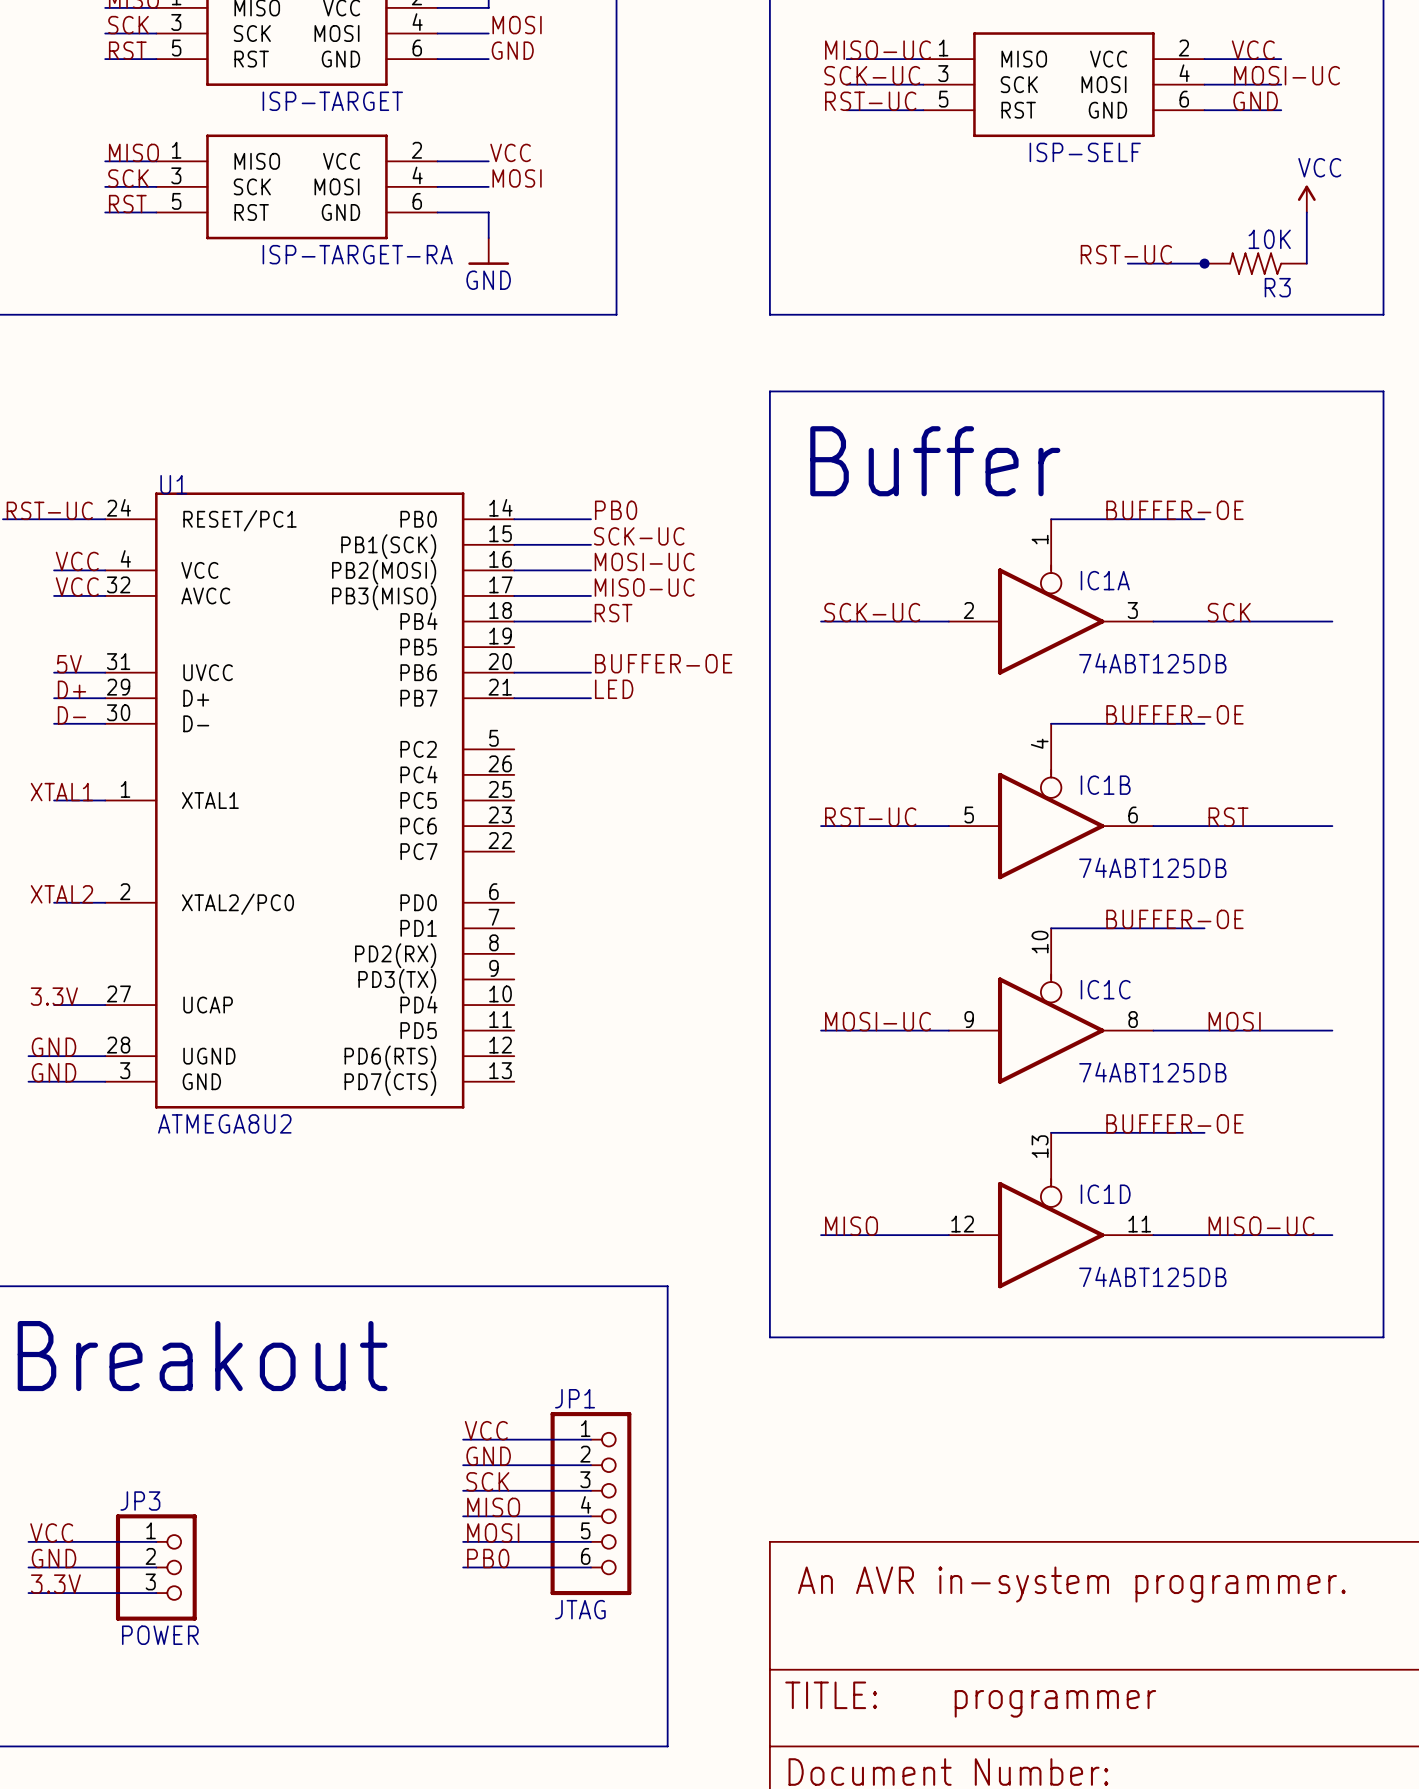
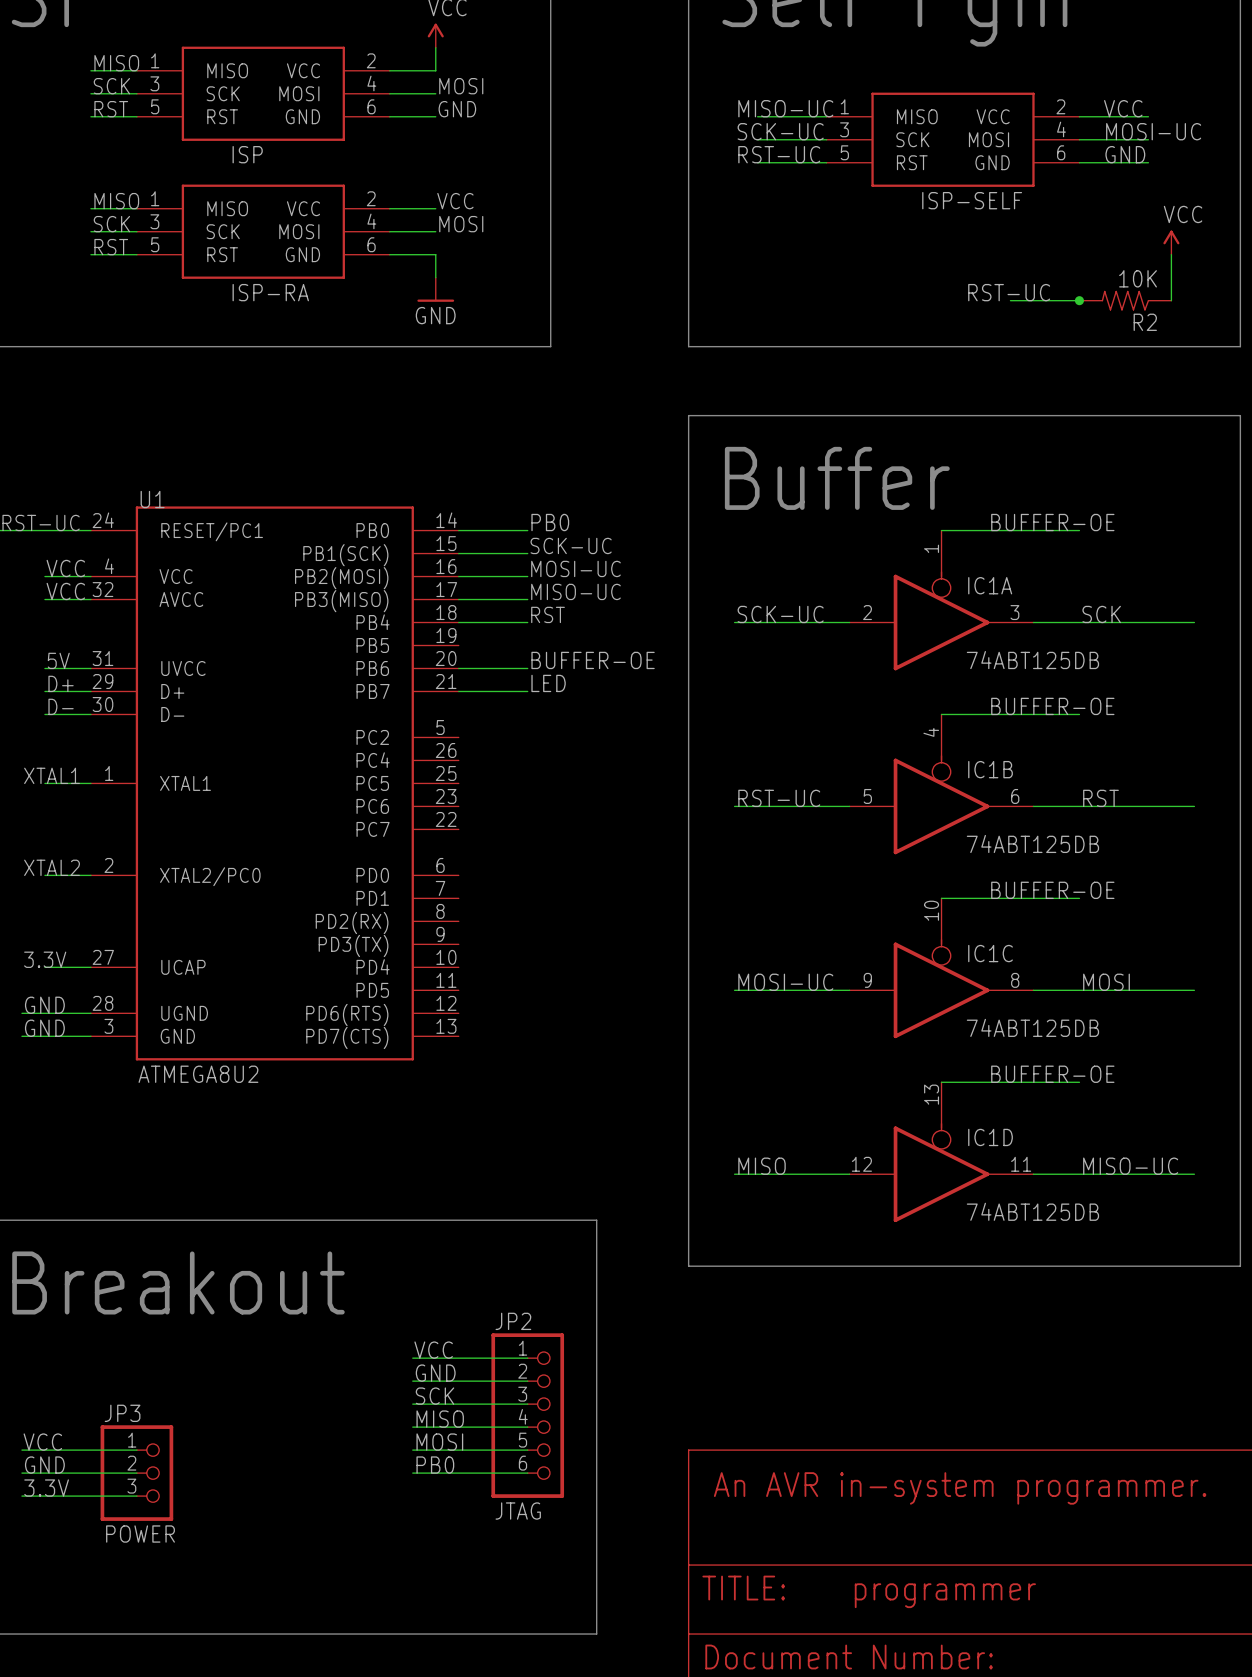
ISP-TARGET name: ISP-TARGET (332, 101) -> ISP (247, 154)
ISP-TARGET-RA name: ISP-TARGET-RA (357, 254) -> ISP-RA (270, 292)
R3 name: R3 (1277, 287) -> R2 (1145, 322)
JP1 name: JP1 (575, 1398) -> JP2 (513, 1321)

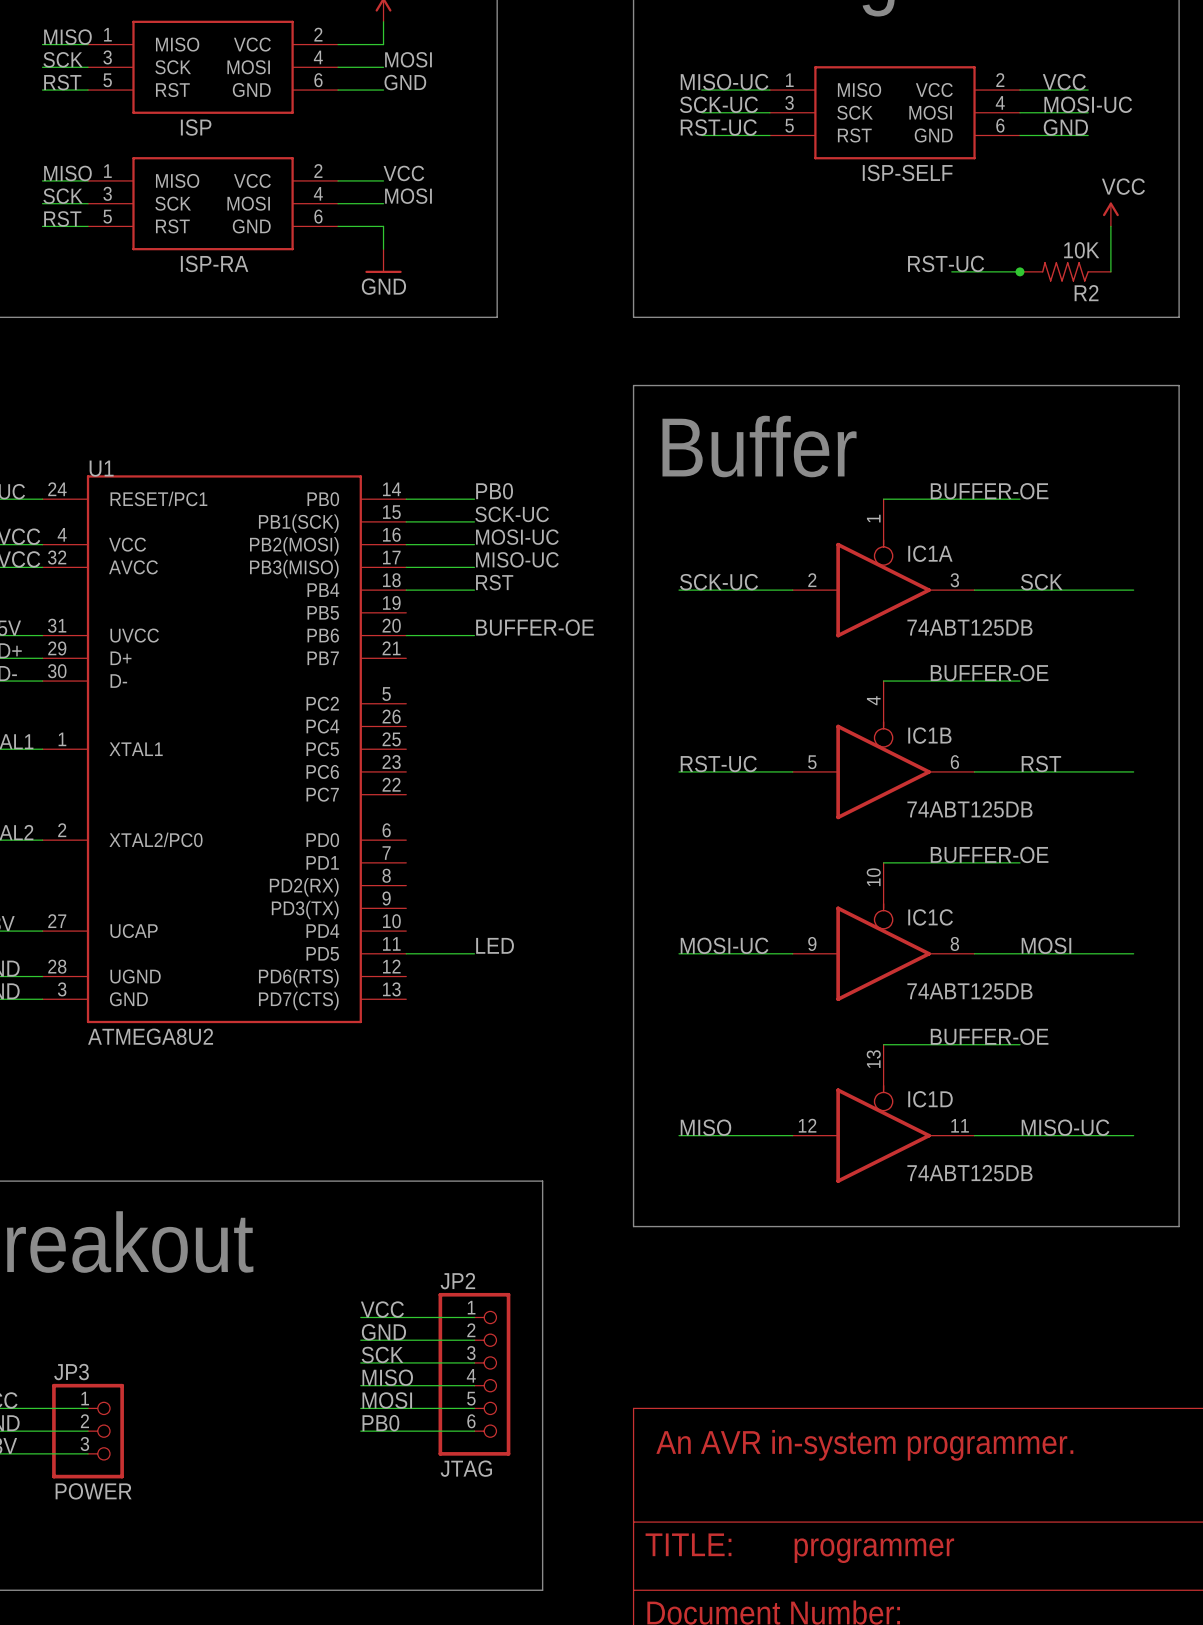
label: LED (548, 683) -> none
wire: (458, 691) (527, 691) -> none
label: none -> LED (495, 945)
wire: none -> (406, 953) (474, 953)

